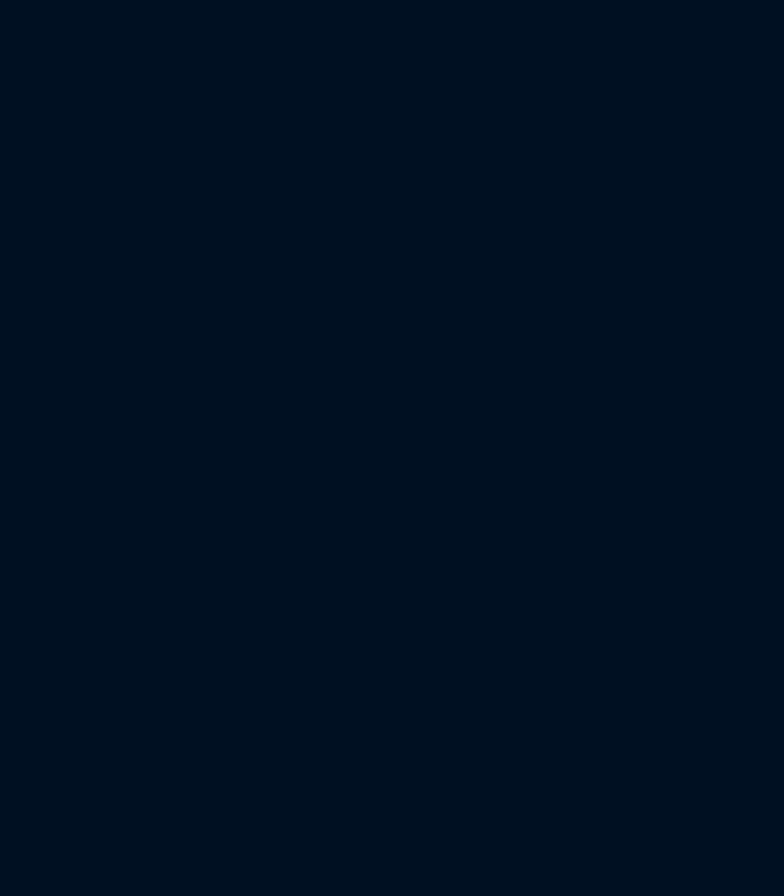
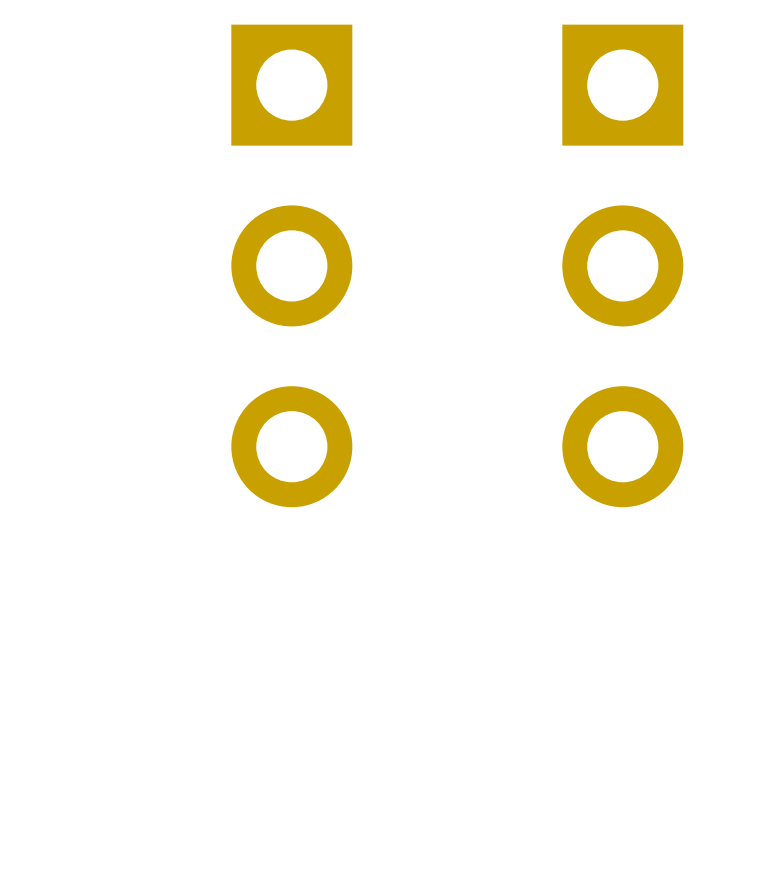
part: none -> (291, 265)
part: none -> (622, 265)

